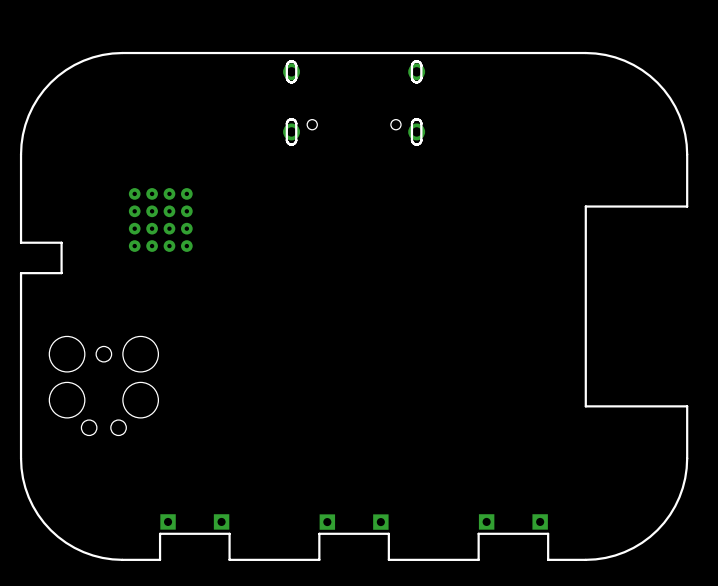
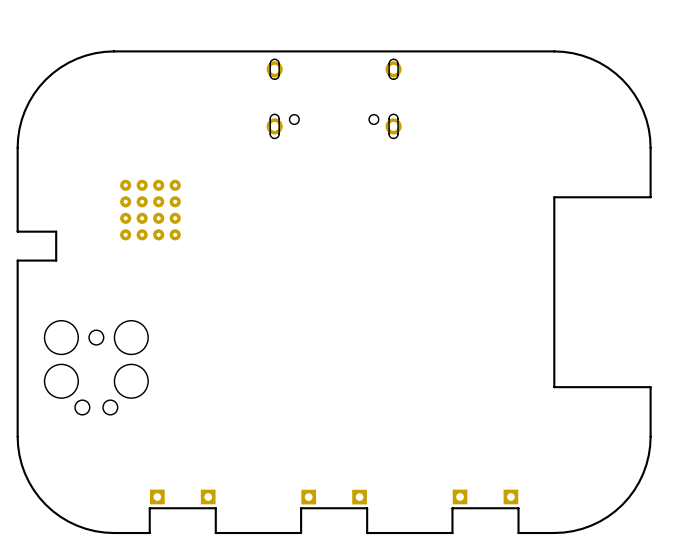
board edge: (291, 61) (296, 66) (296, 78) (291, 82) (286, 77) (287, 64) (291, 61) -> none
board edge: (416, 61) (421, 66) (421, 78) (416, 82) (411, 77) (412, 64) (416, 61) -> none
board edge: (291, 119) (296, 123) (296, 141) (291, 144) (286, 139) (287, 122) (291, 119) -> none
board edge: (416, 119) (421, 123) (421, 141) (416, 144) (411, 139) (412, 122) (416, 119) -> none

